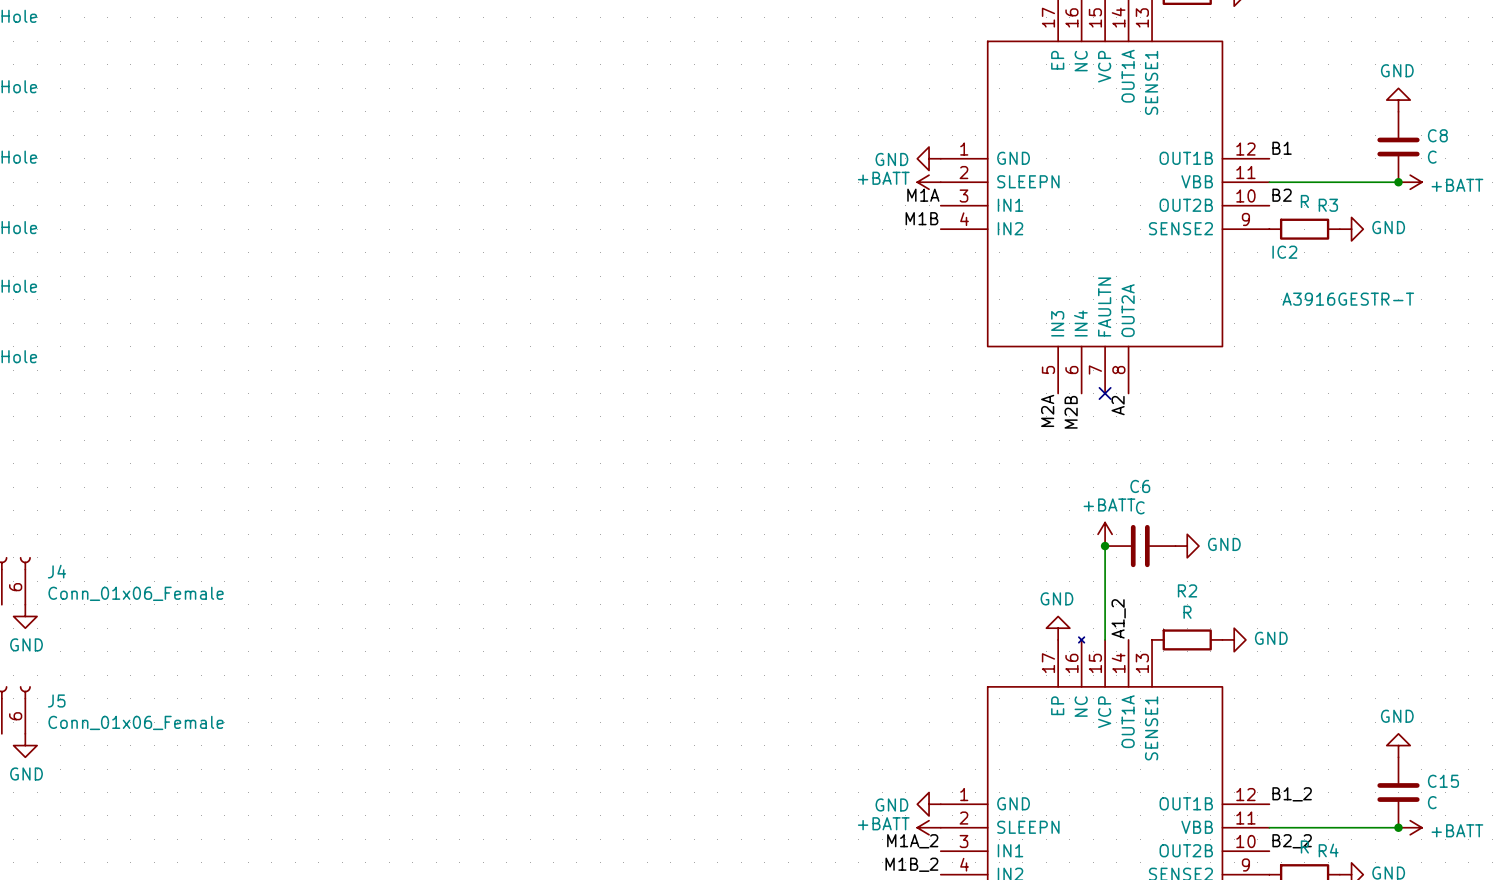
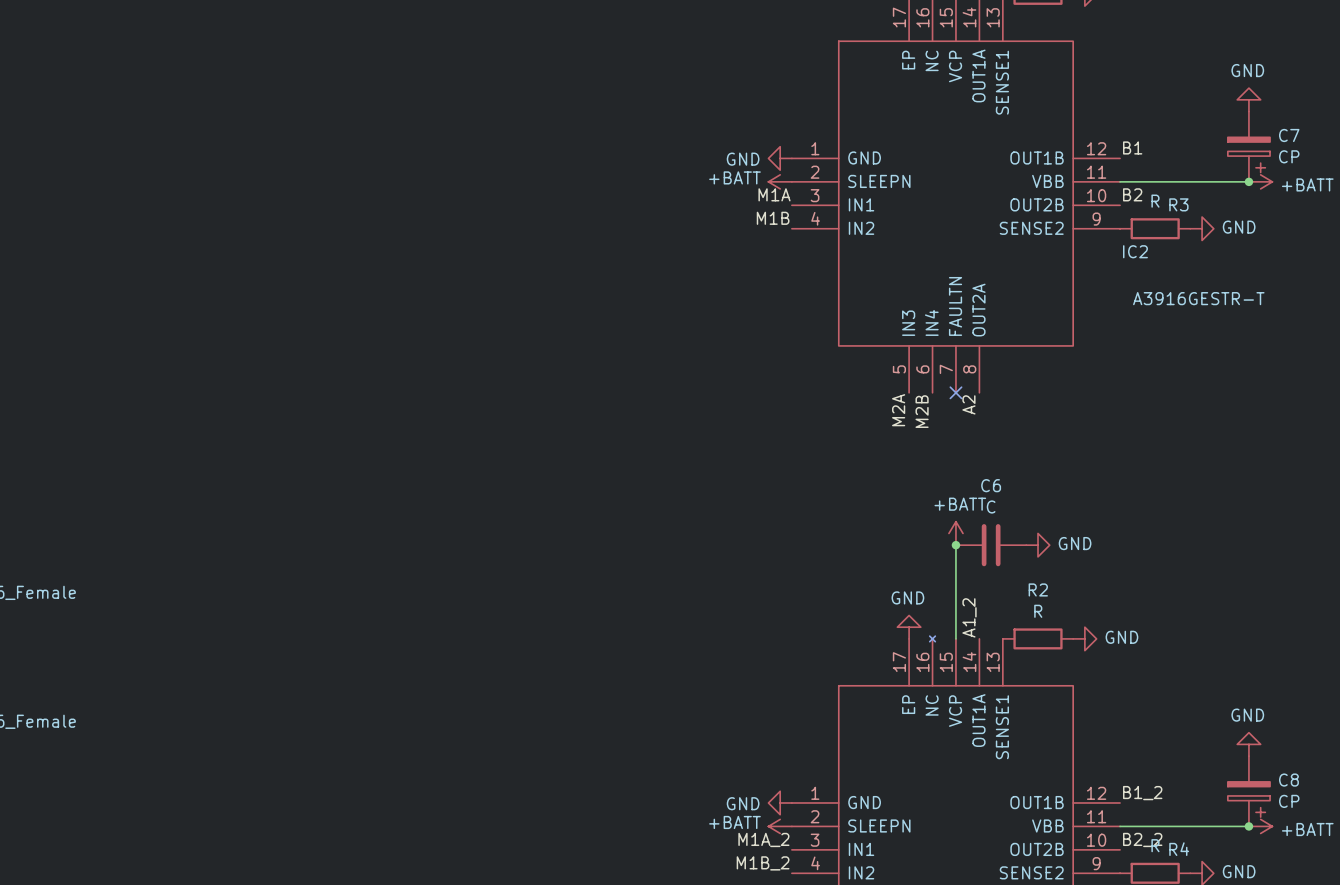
C8 symbol: [1377, 111, 1420, 183] -> [1227, 756, 1271, 827]
C7: none -> CP (1248, 146)
C8 value: C (1432, 157) -> CP (1289, 801)
C15: C (1398, 792) -> none

